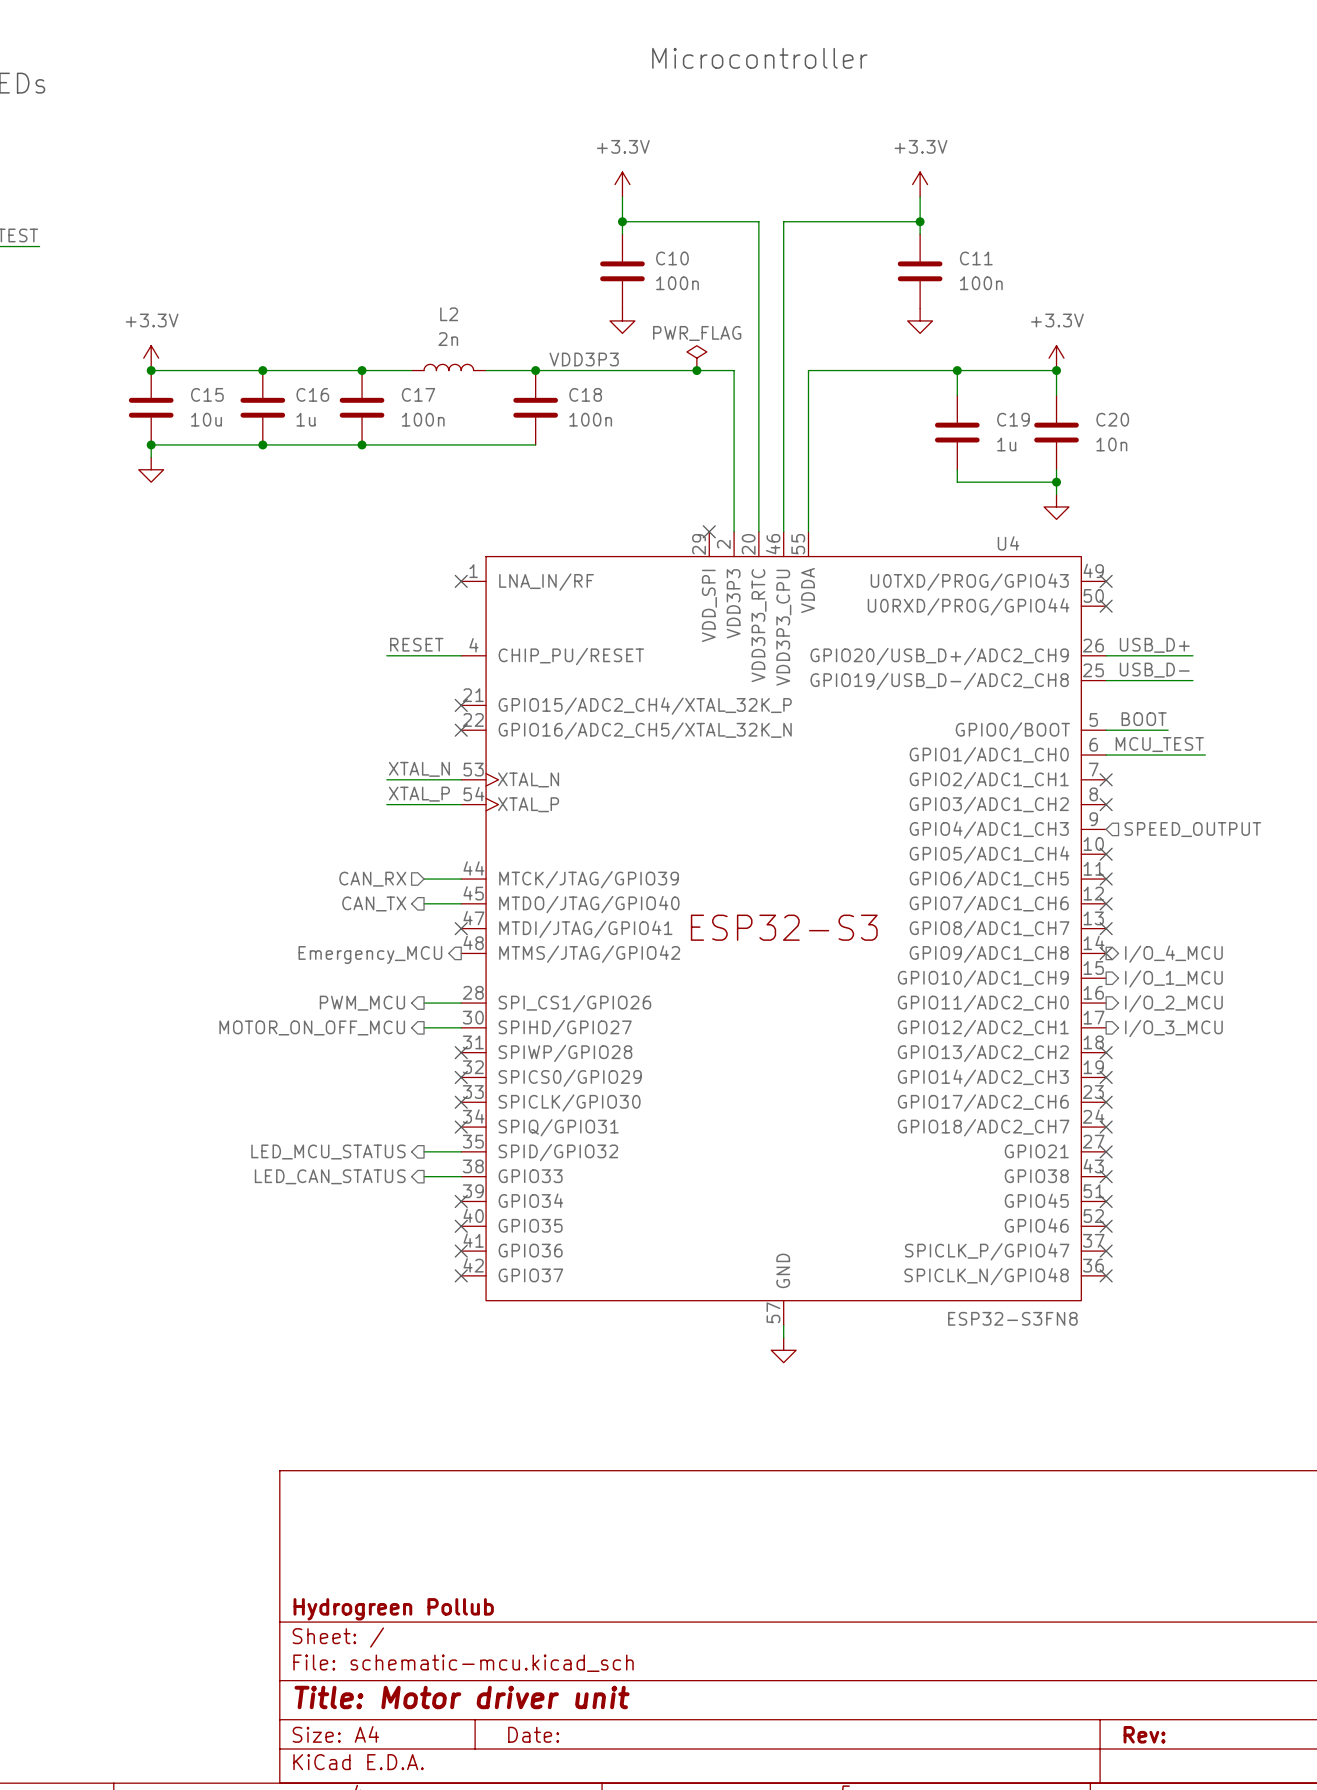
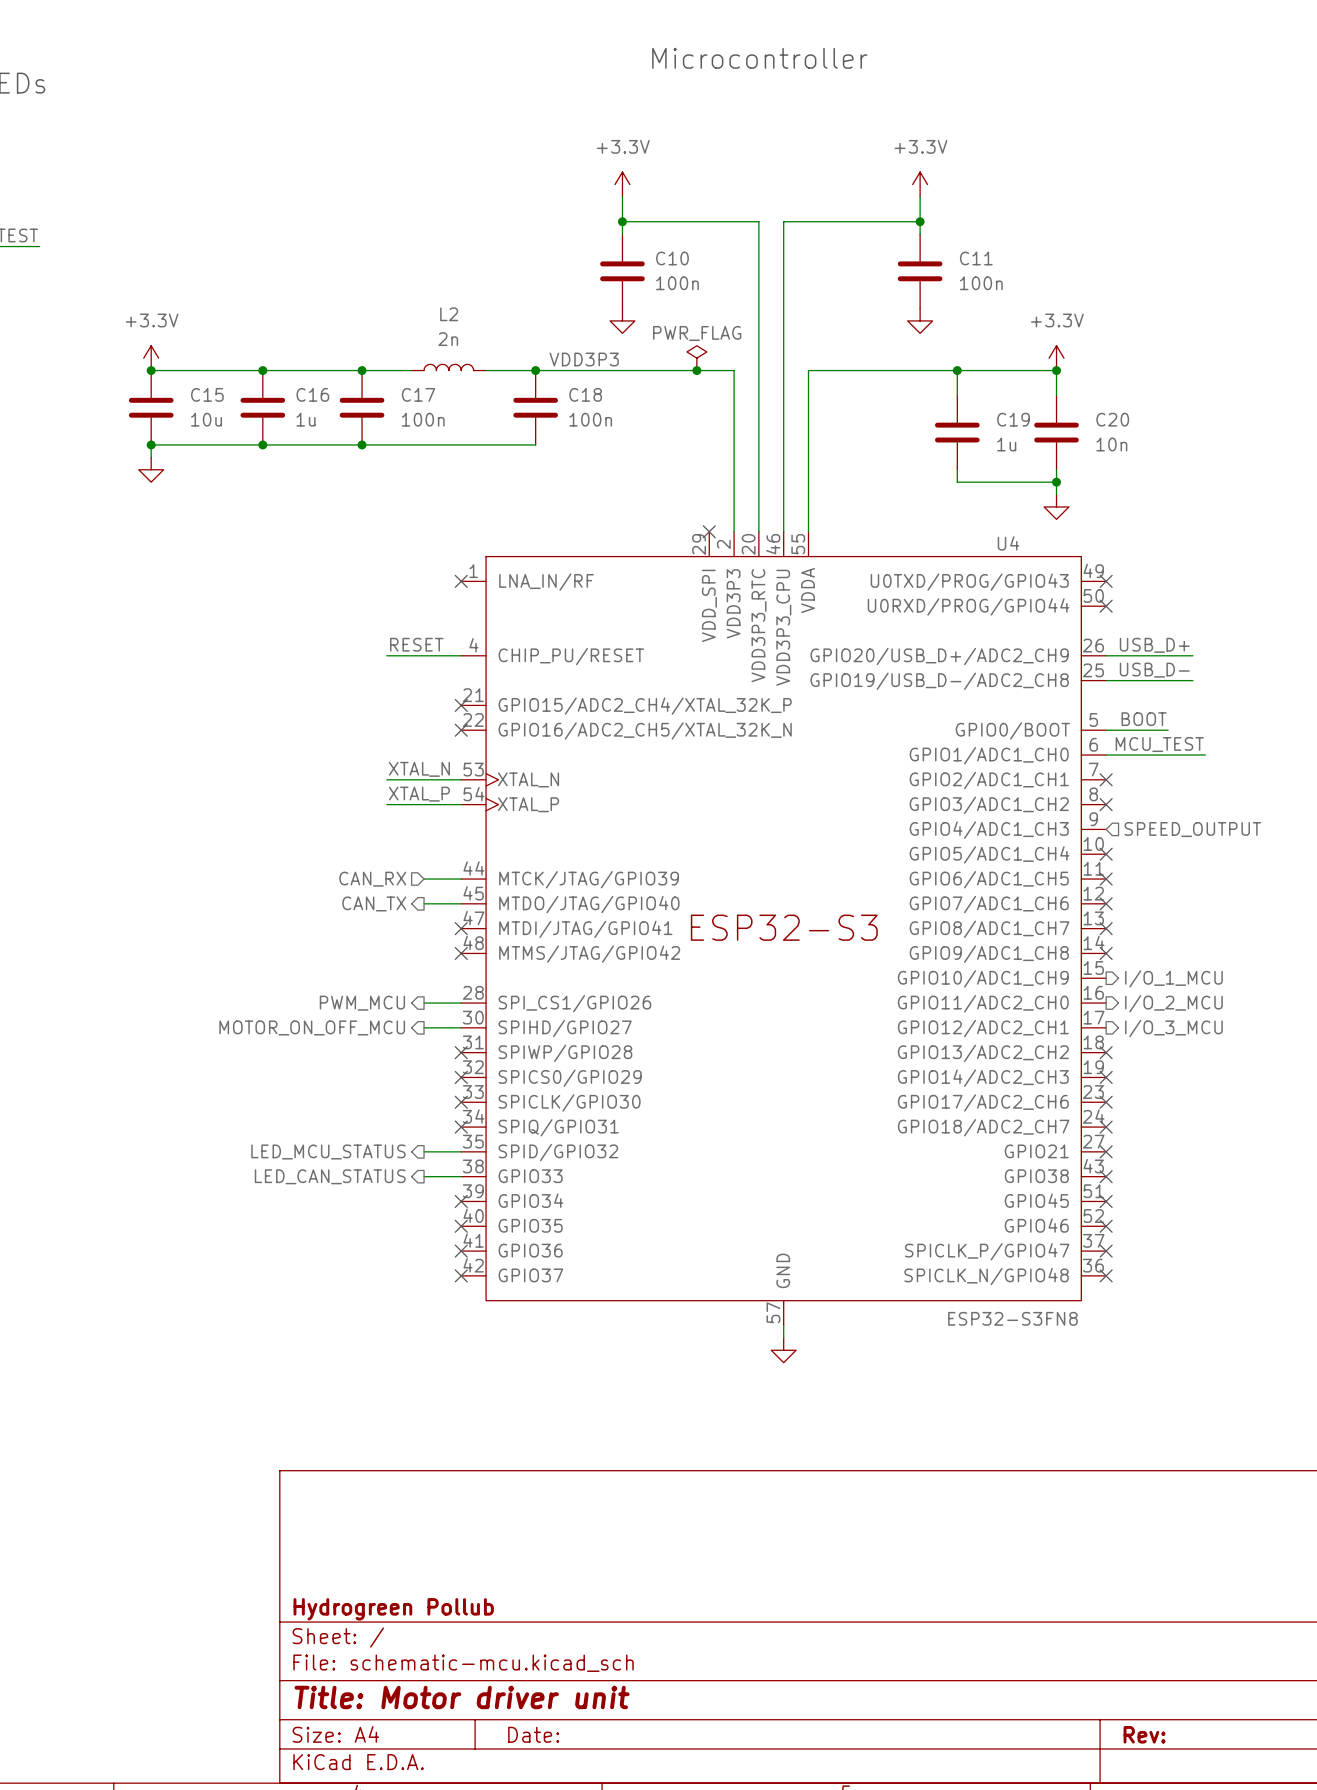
no-connect mark: none -> (461, 953)
hierarchical label: I/O_4_MCU (1173, 954) -> none
hierarchical label: Emergency_MCU (370, 955) -> none

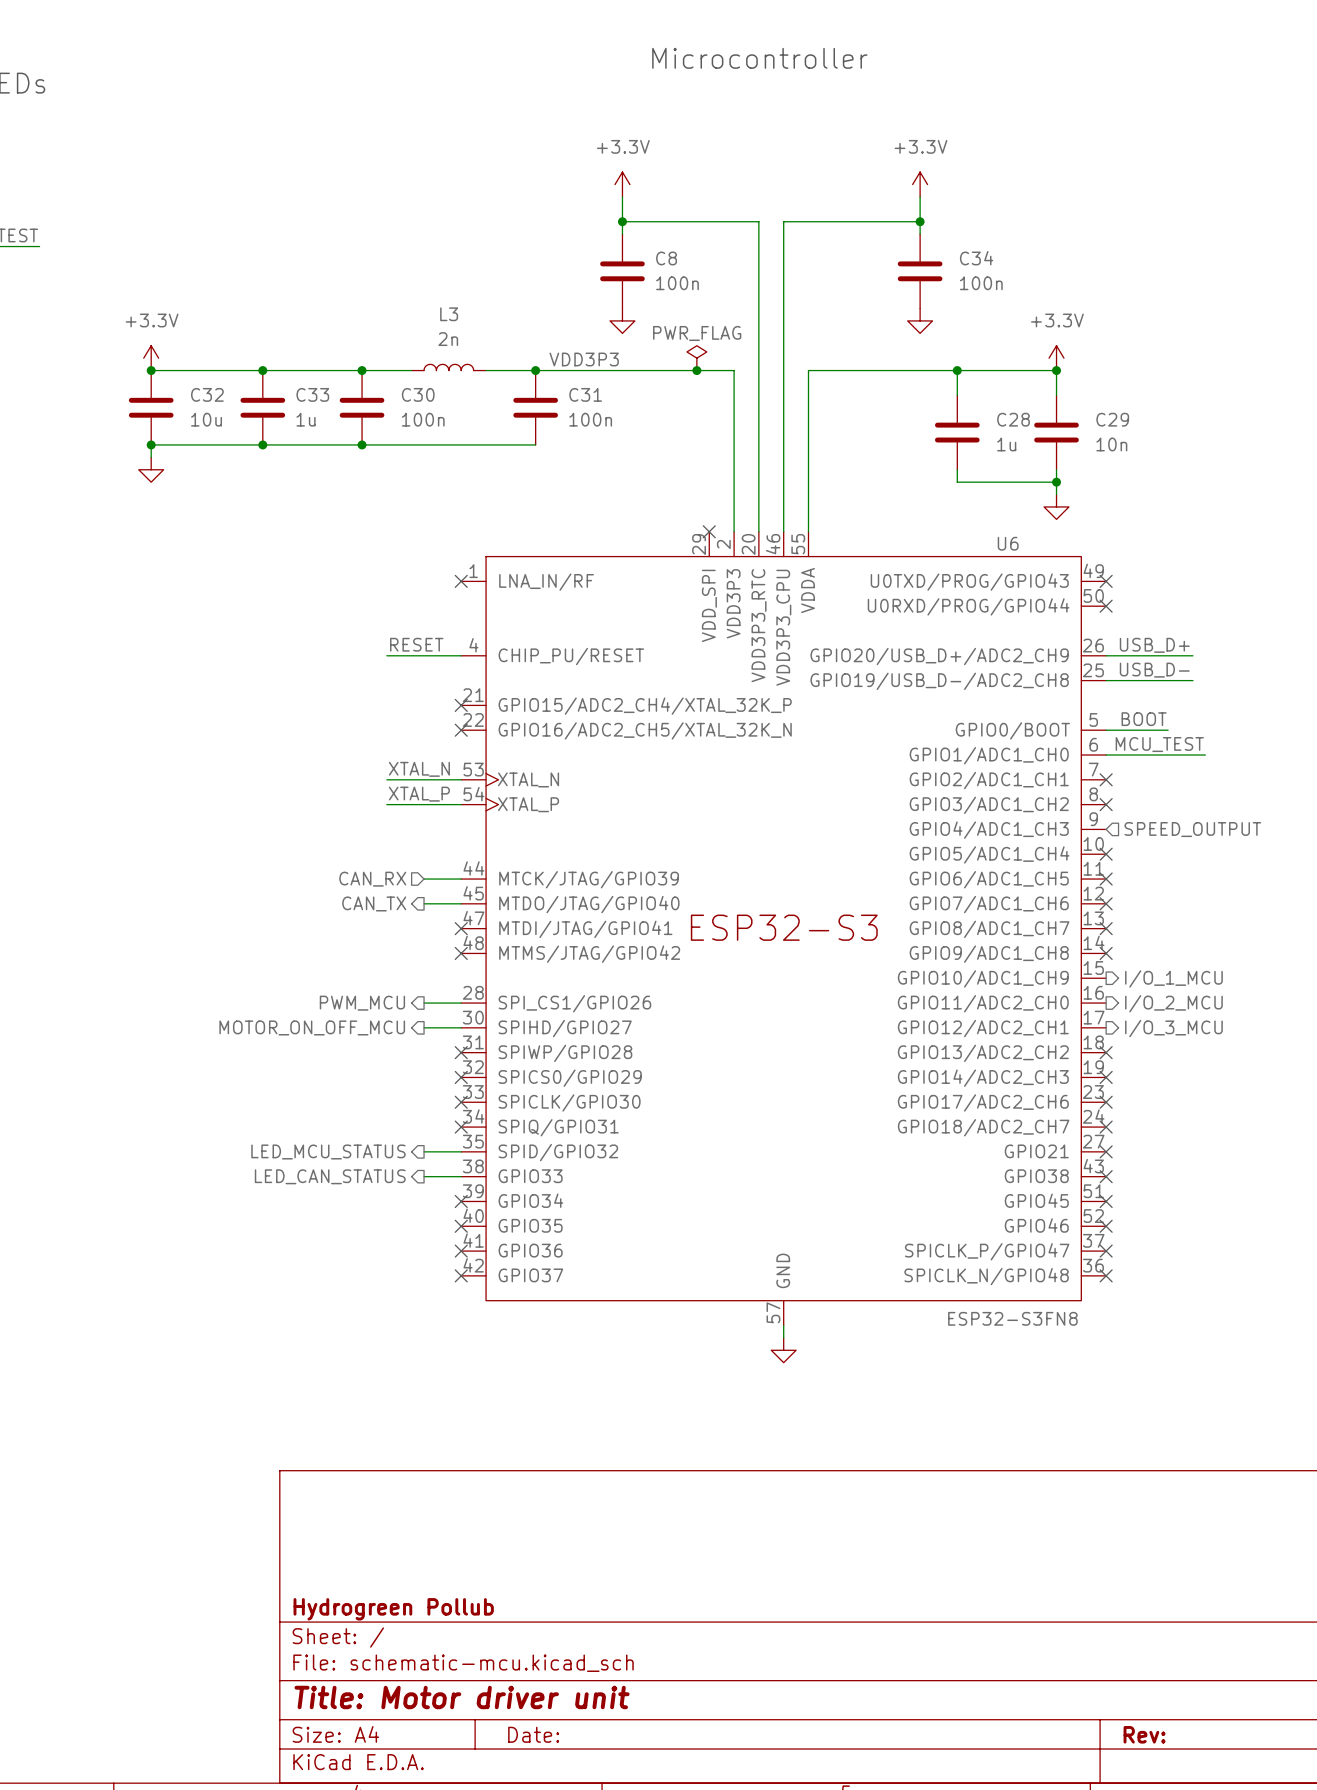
C10 name: C10 (672, 258) -> C8 (666, 258)
C11 name: C11 (976, 258) -> C34 (976, 258)
L2 name: L2 (449, 314) -> L3 (449, 314)
C15 name: C15 (207, 394) -> C32 (207, 394)
C16 name: C16 (312, 394) -> C33 (312, 394)
C17 name: C17 (418, 394) -> C30 (418, 394)
C18 name: C18 (585, 394) -> C31 (585, 394)
C19 name: C19 (1013, 419) -> C28 (1013, 419)
C20 name: C20 (1112, 419) -> C29 (1112, 419)
U4 name: U4 (1008, 543) -> U6 (1008, 543)

